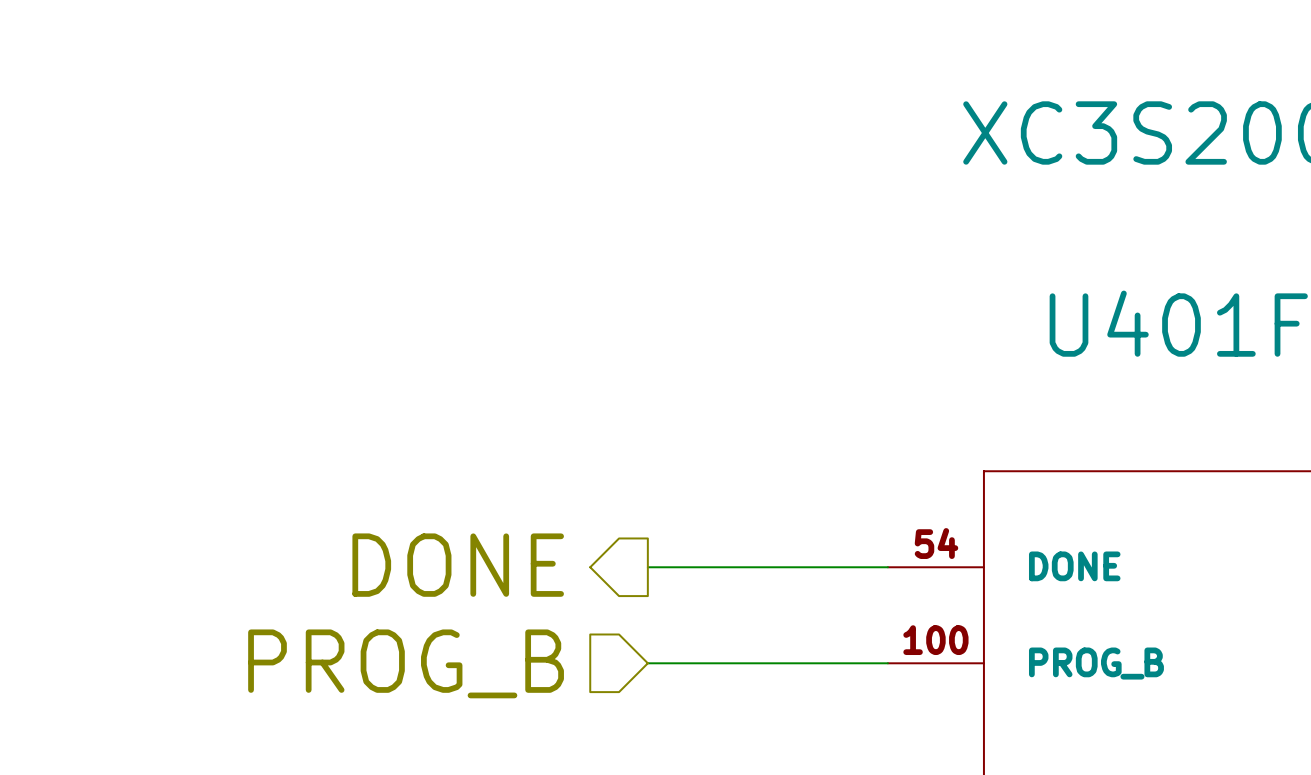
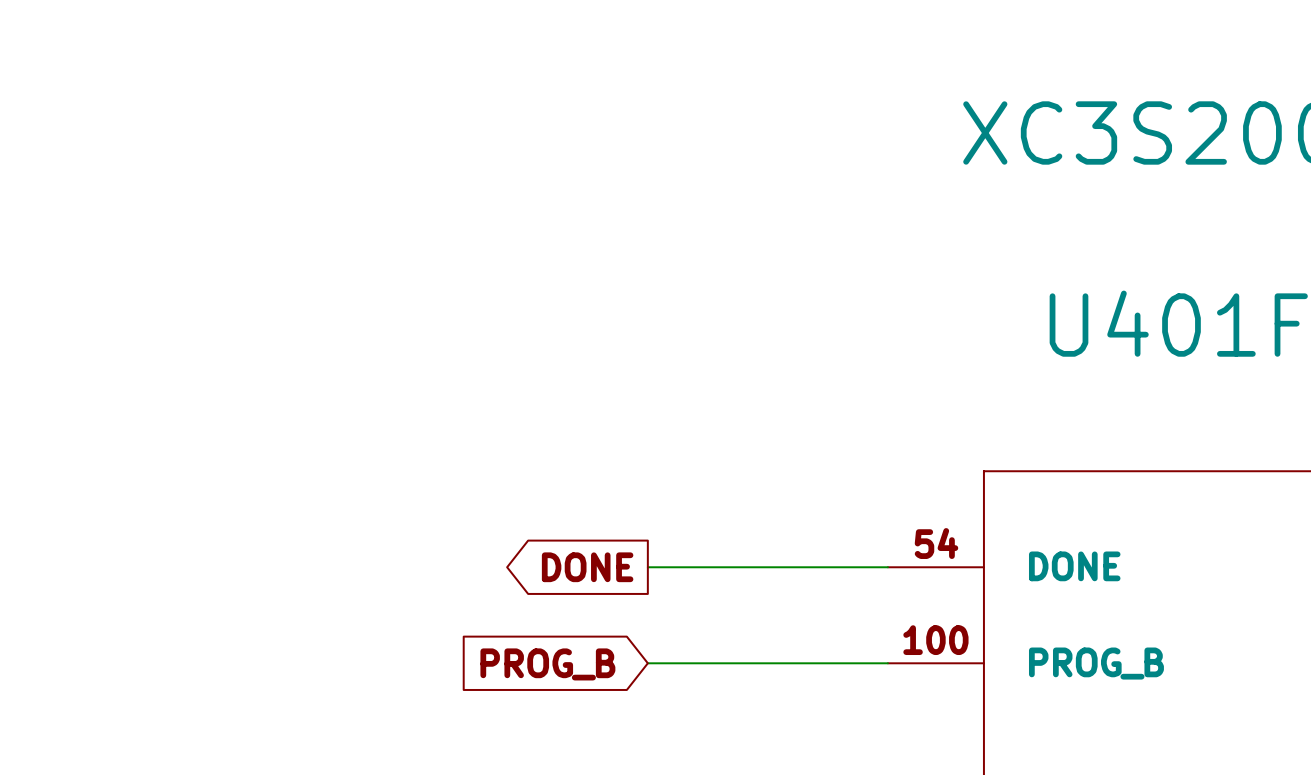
hierarchical label: DONE (458, 565) -> none
global label: none -> DONE (587, 567)
hierarchical label: PROG_B (406, 663) -> none
global label: none -> PROG_B (547, 664)

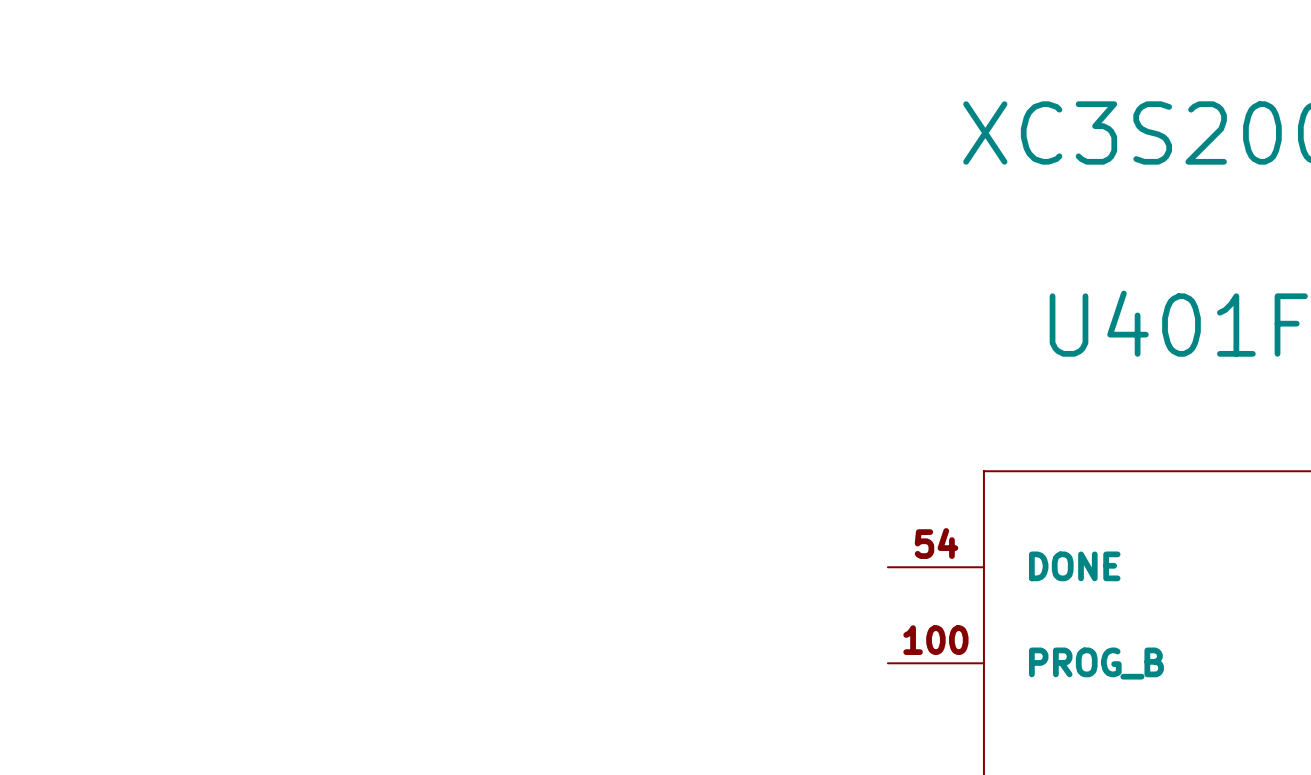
global label: DONE (587, 567) -> none
wire: (647, 567) (887, 567) -> none
wire: (647, 663) (887, 663) -> none
global label: PROG_B (547, 664) -> none

